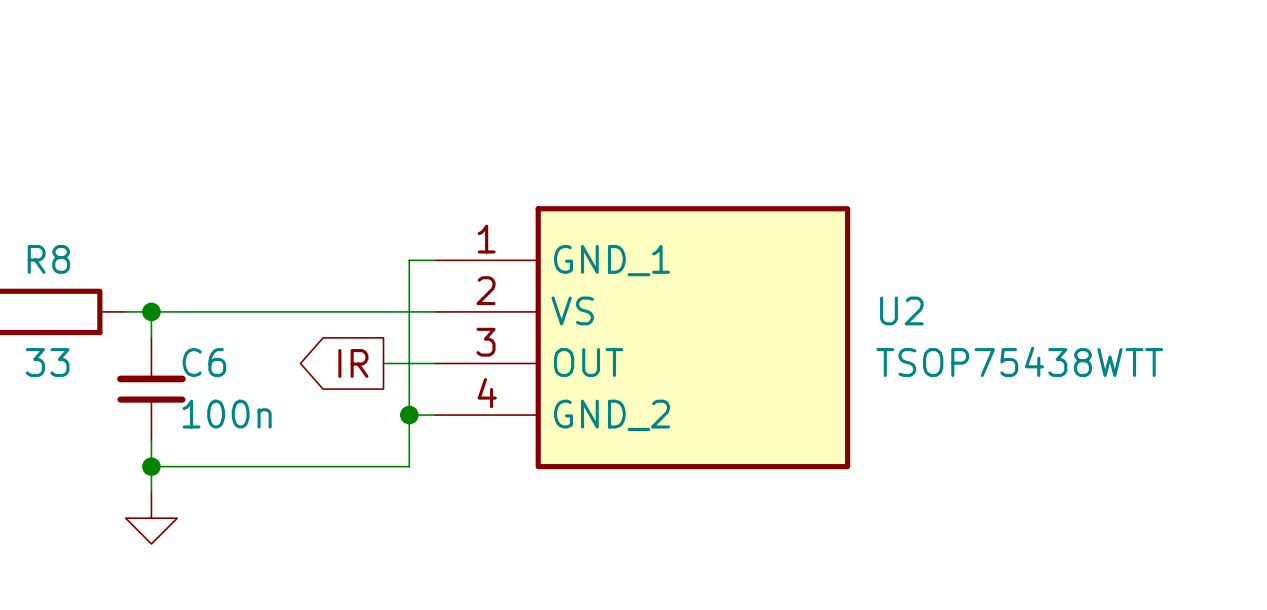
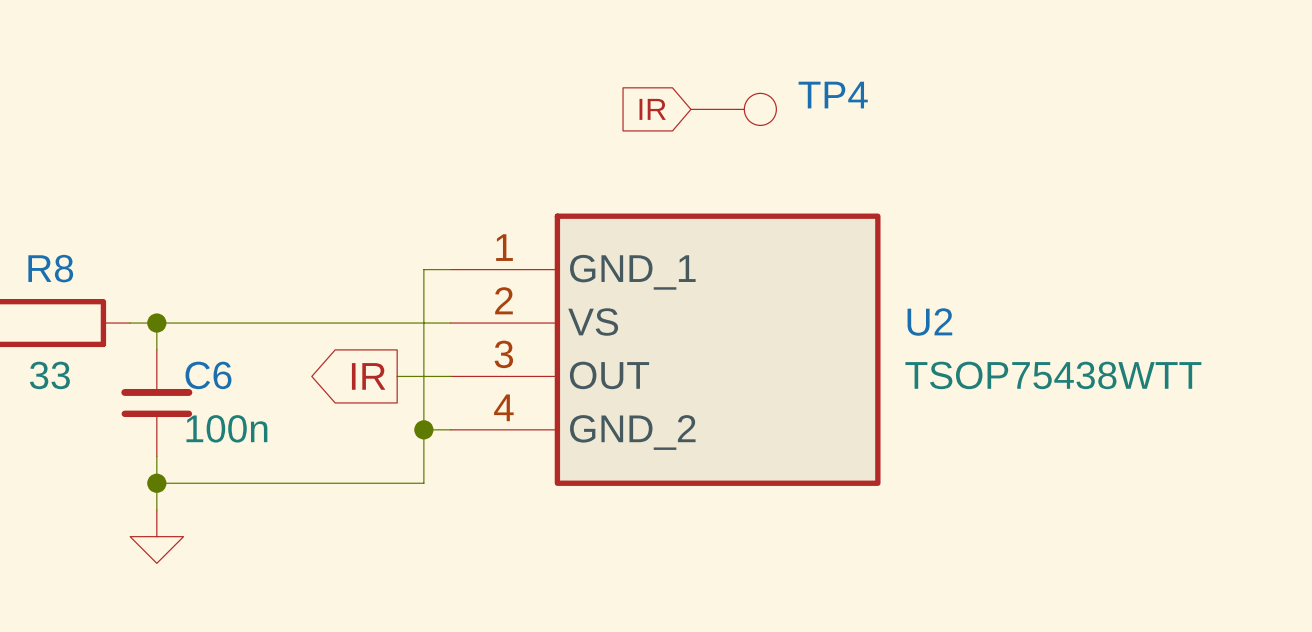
global label: none -> IR (652, 109)
TP4: none -> (733, 109)

